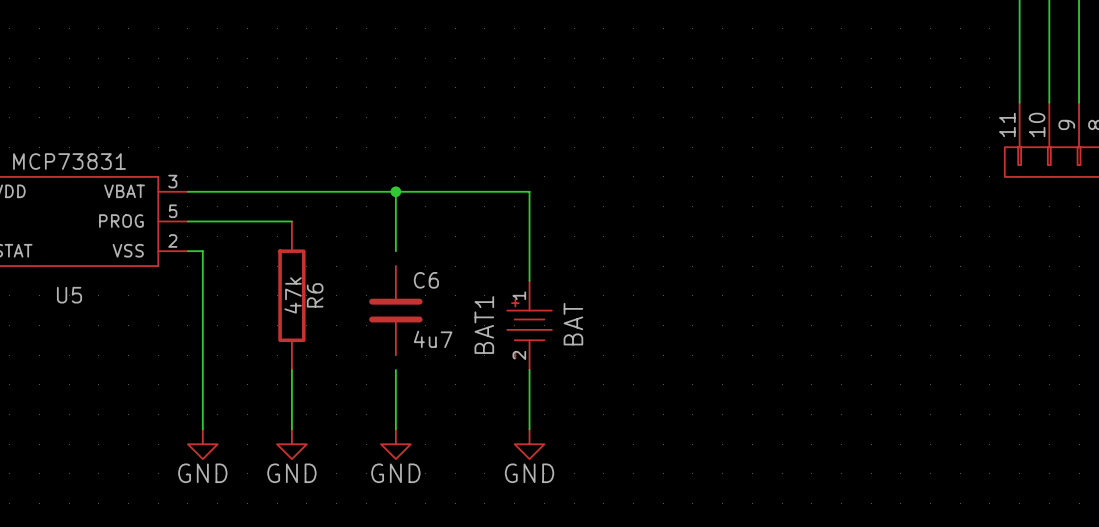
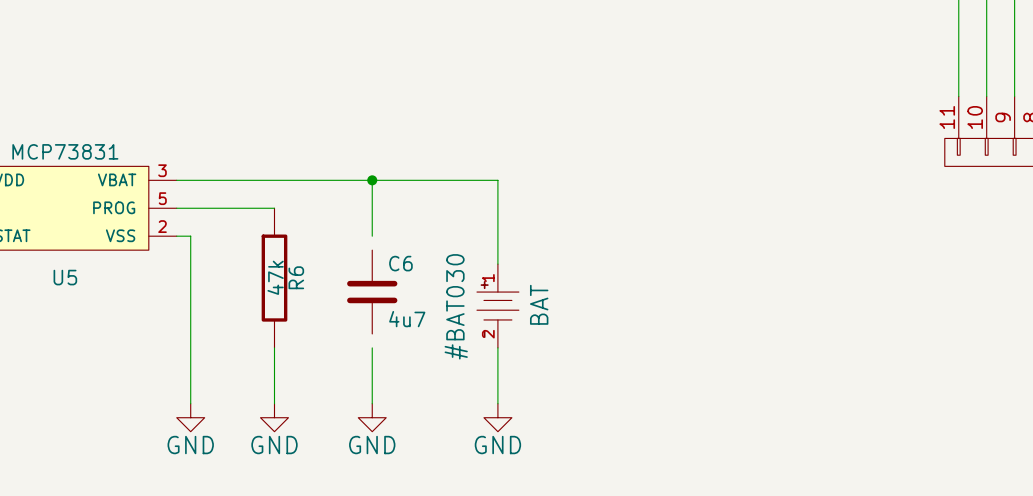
BAT1 name: BAT1 (484, 325) -> #BAT030 (456, 306)

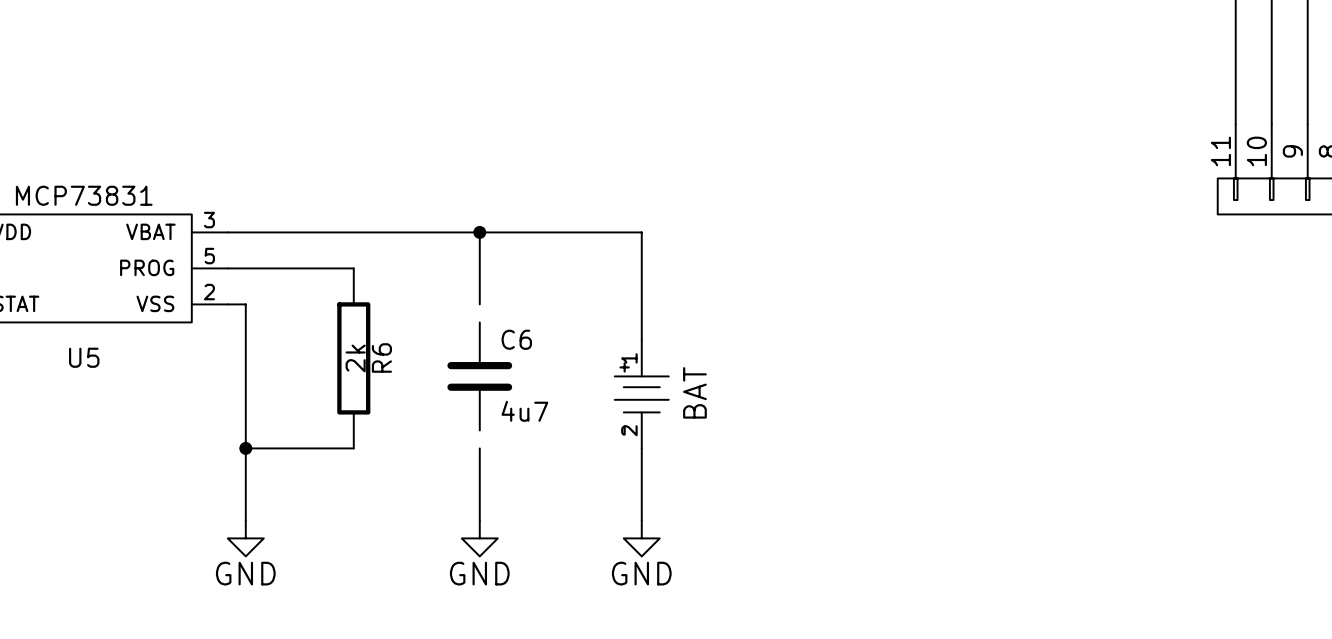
R6 value: 47k (275, 277) -> 2k (355, 358)
#BAT030 name: #BAT030 (456, 306) -> none
junction: none -> (245, 448)
wire: (274, 347) (274, 403) -> (353, 448) (245, 448)
power symbol: GND (274, 417) -> none

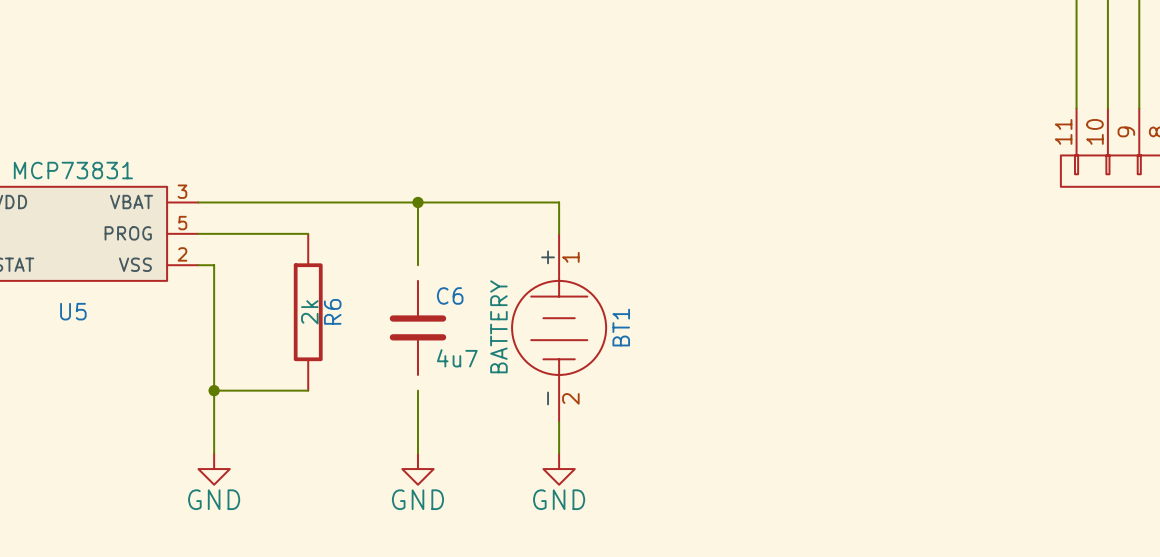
BT1: none -> BATTERY (559, 327)
power symbol: BAT (641, 394) -> none

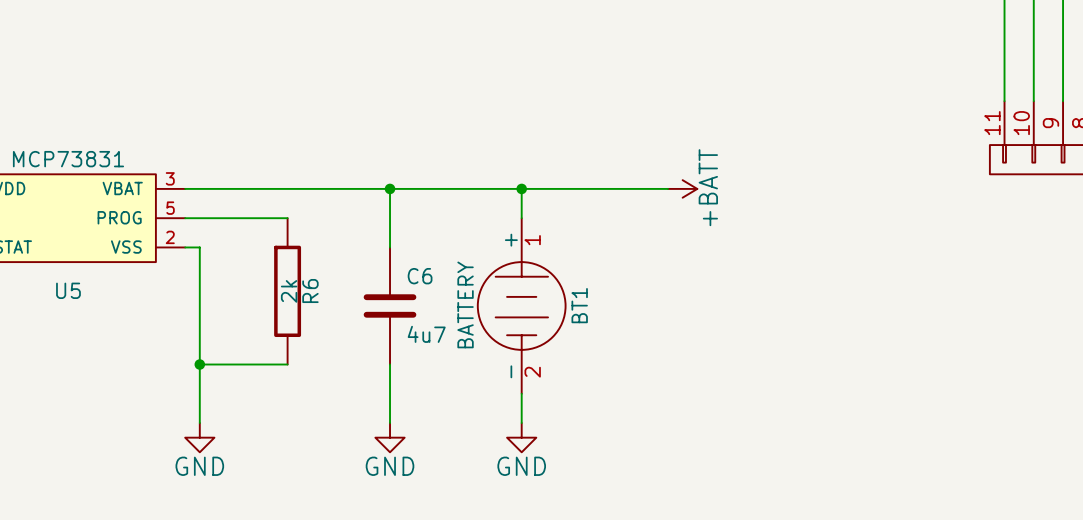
wire: none -> (521, 188) (668, 188)
junction: none -> (521, 188)
power symbol: none -> +BATT (682, 188)
C6 symbol: [389, 280, 447, 375] -> [363, 247, 417, 365]

